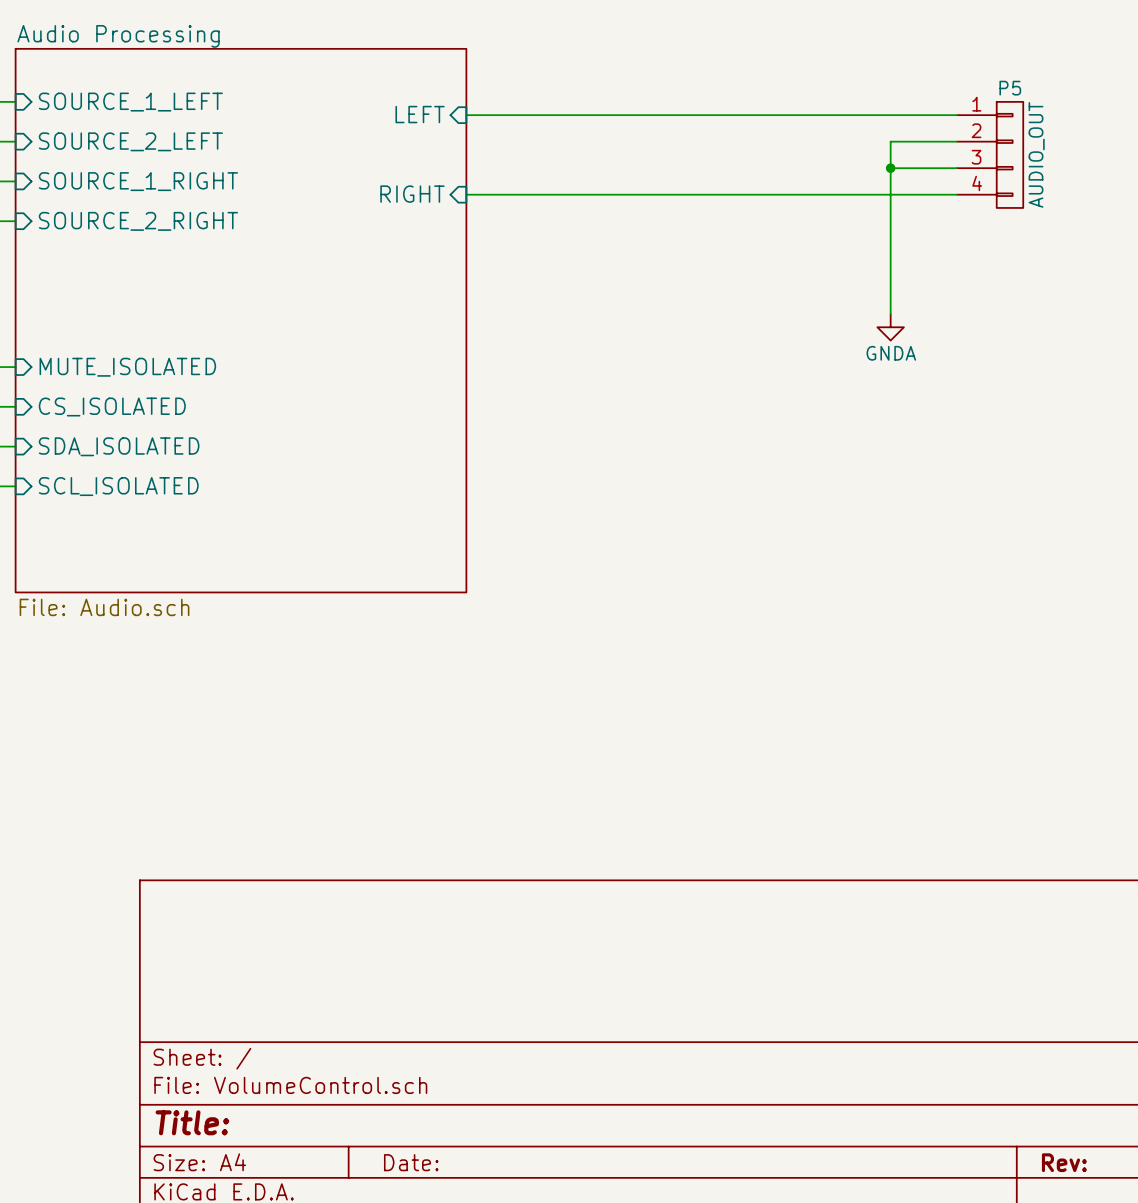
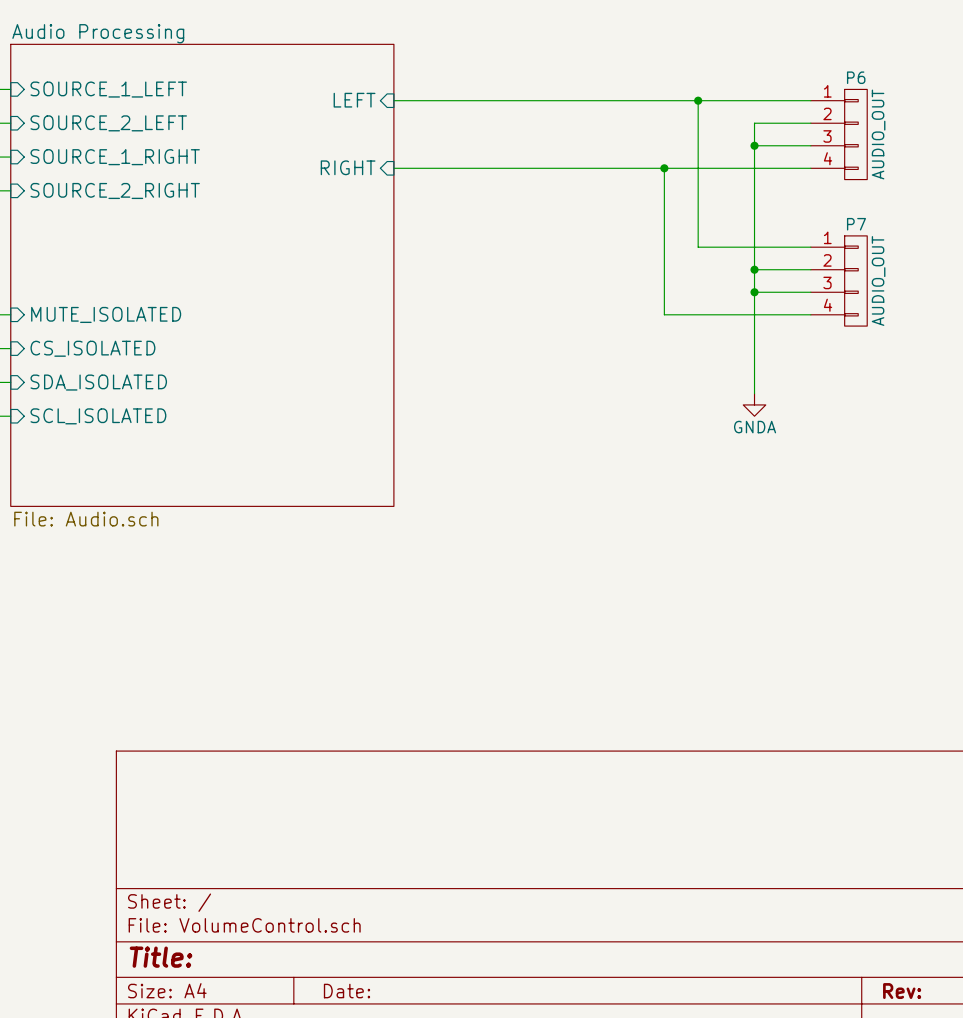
P5 name: P5 (1010, 88) -> P6 (856, 77)
wire: none -> (698, 100) (698, 247) (810, 247)
junction: none -> (698, 100)
wire: none -> (664, 168) (664, 314) (810, 314)
junction: none -> (664, 168)
junction: none -> (754, 269)
wire: none -> (810, 269) (754, 269) (754, 393)
power symbol position: GNDA (890, 327) -> GNDA (754, 404)
P7: none -> AUDIO_OUT (839, 280)
wire: none -> (754, 292) (810, 292)
junction: none -> (754, 292)

